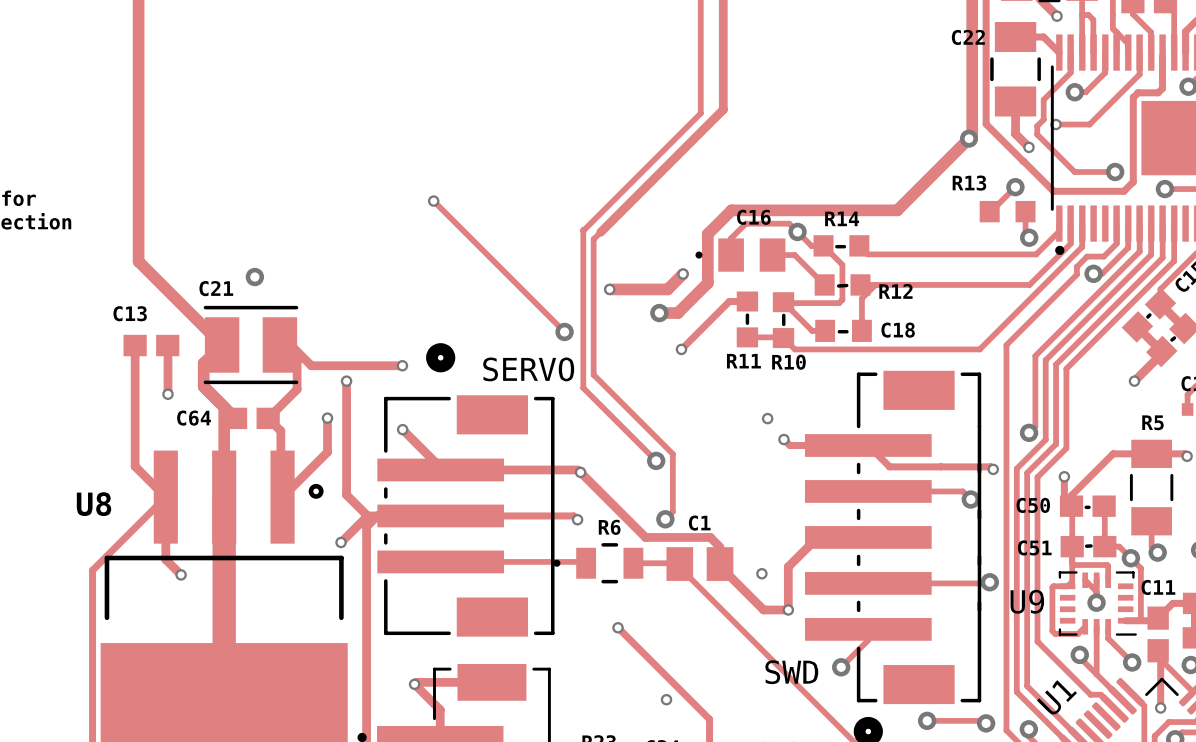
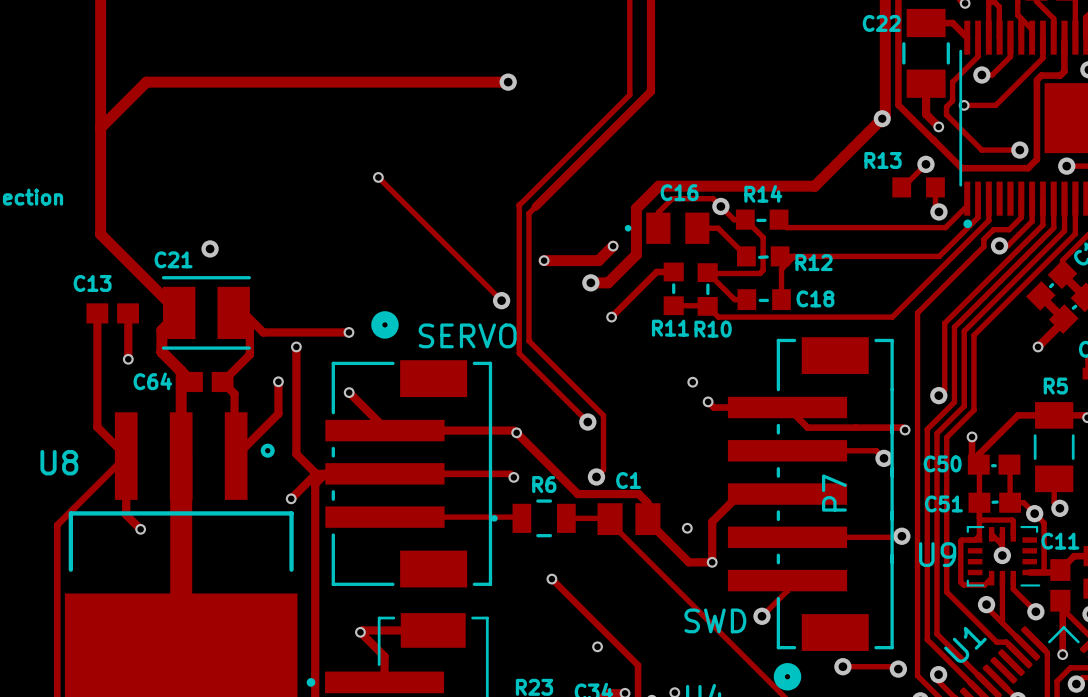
track: none -> (508, 82) (146, 82) (100, 128)
via: none -> (508, 82)
P7 name: none -> P7 (834, 493)

